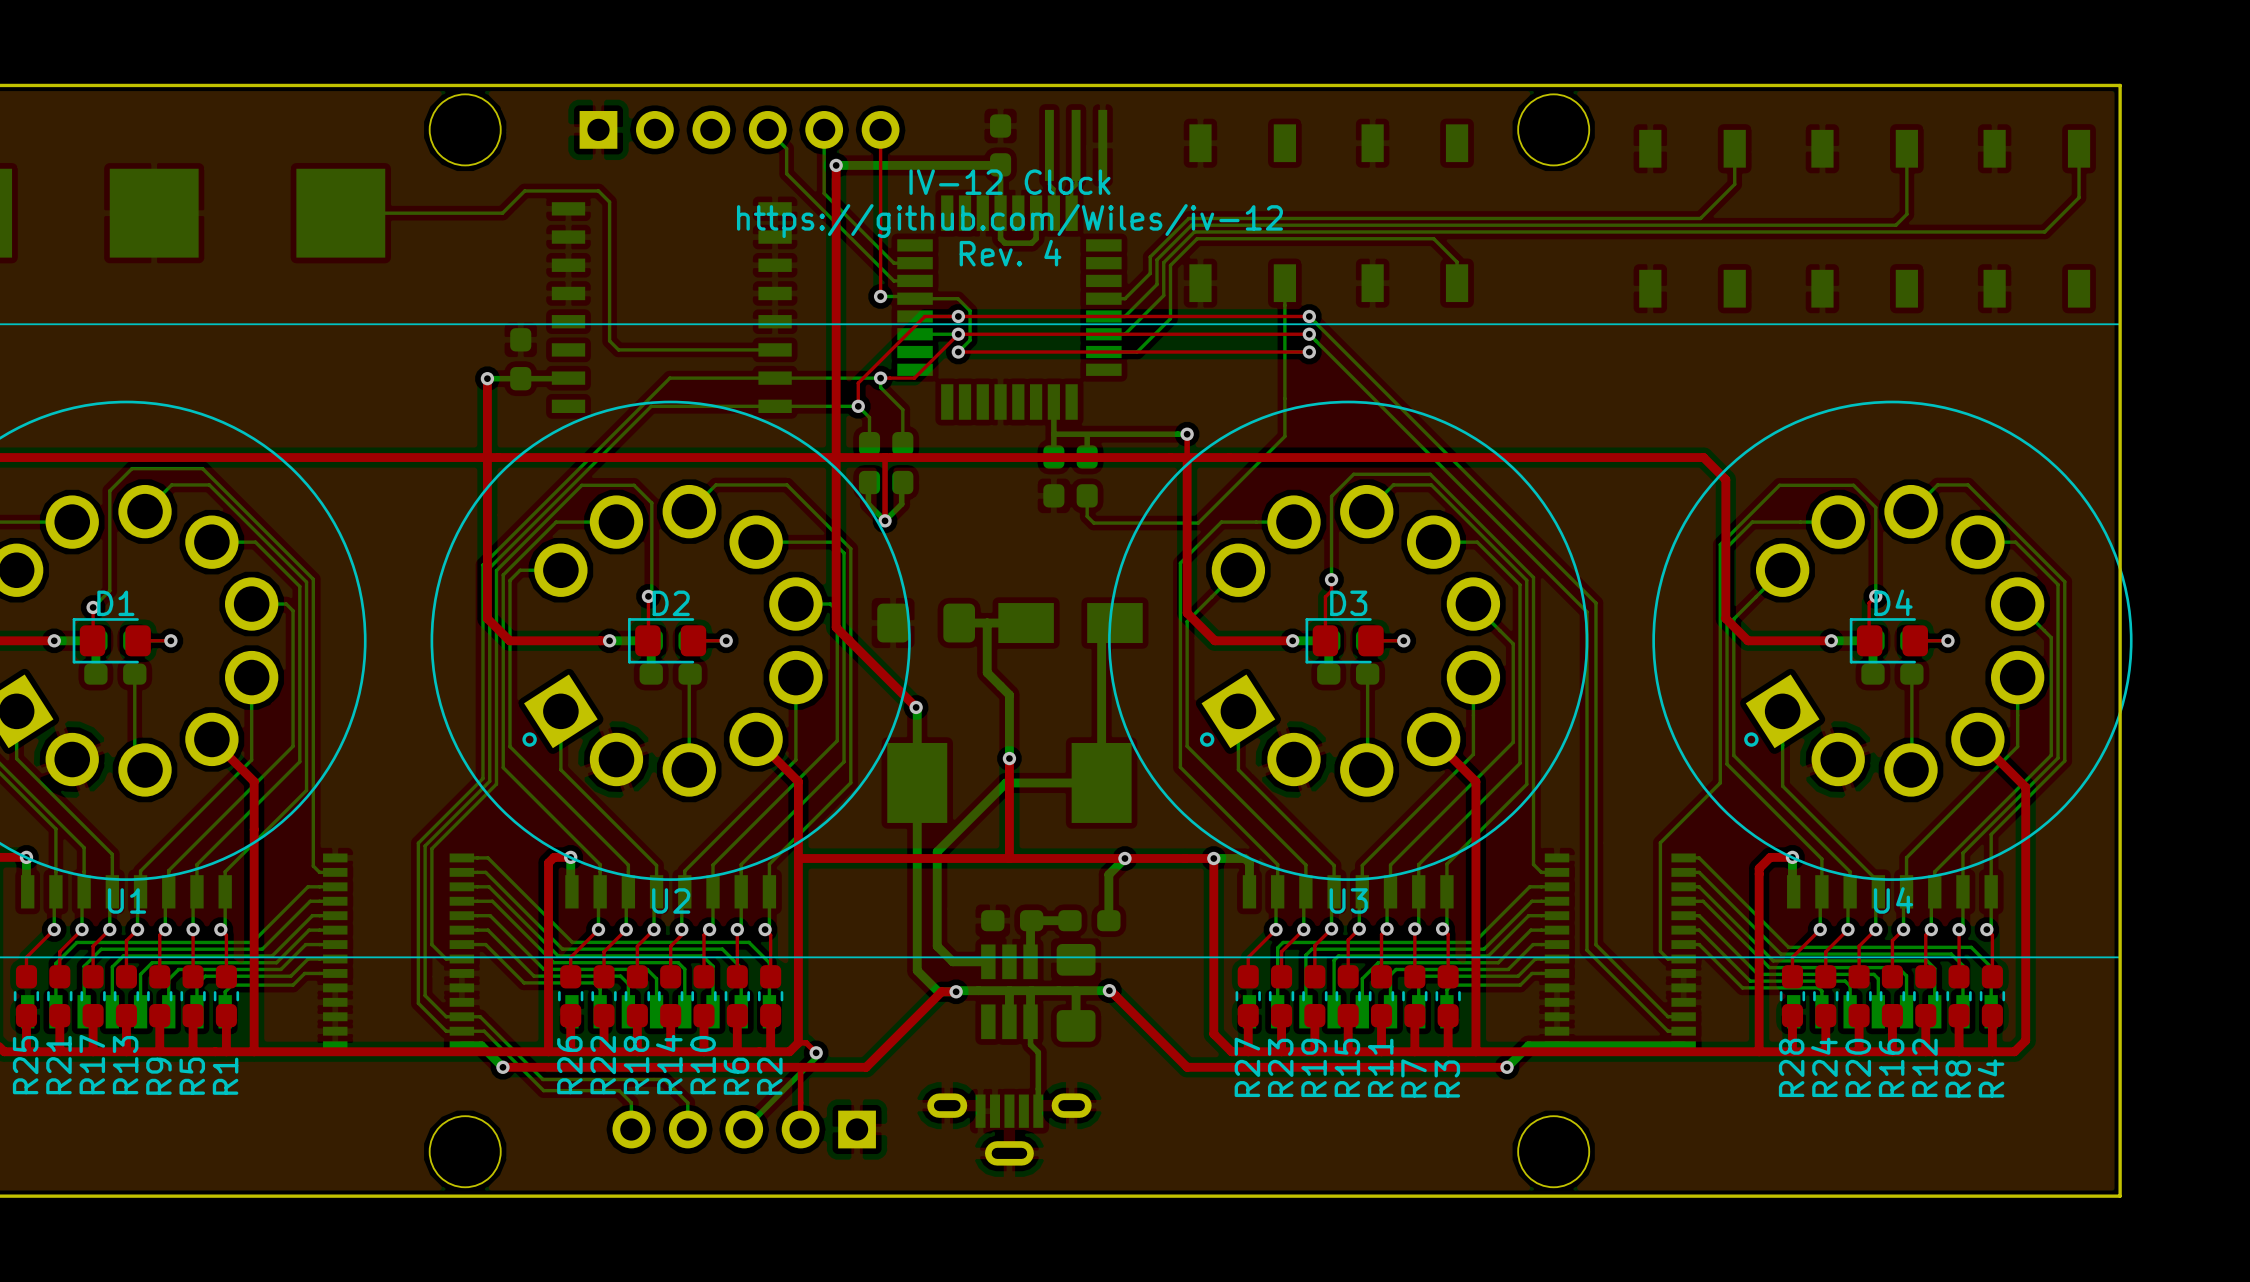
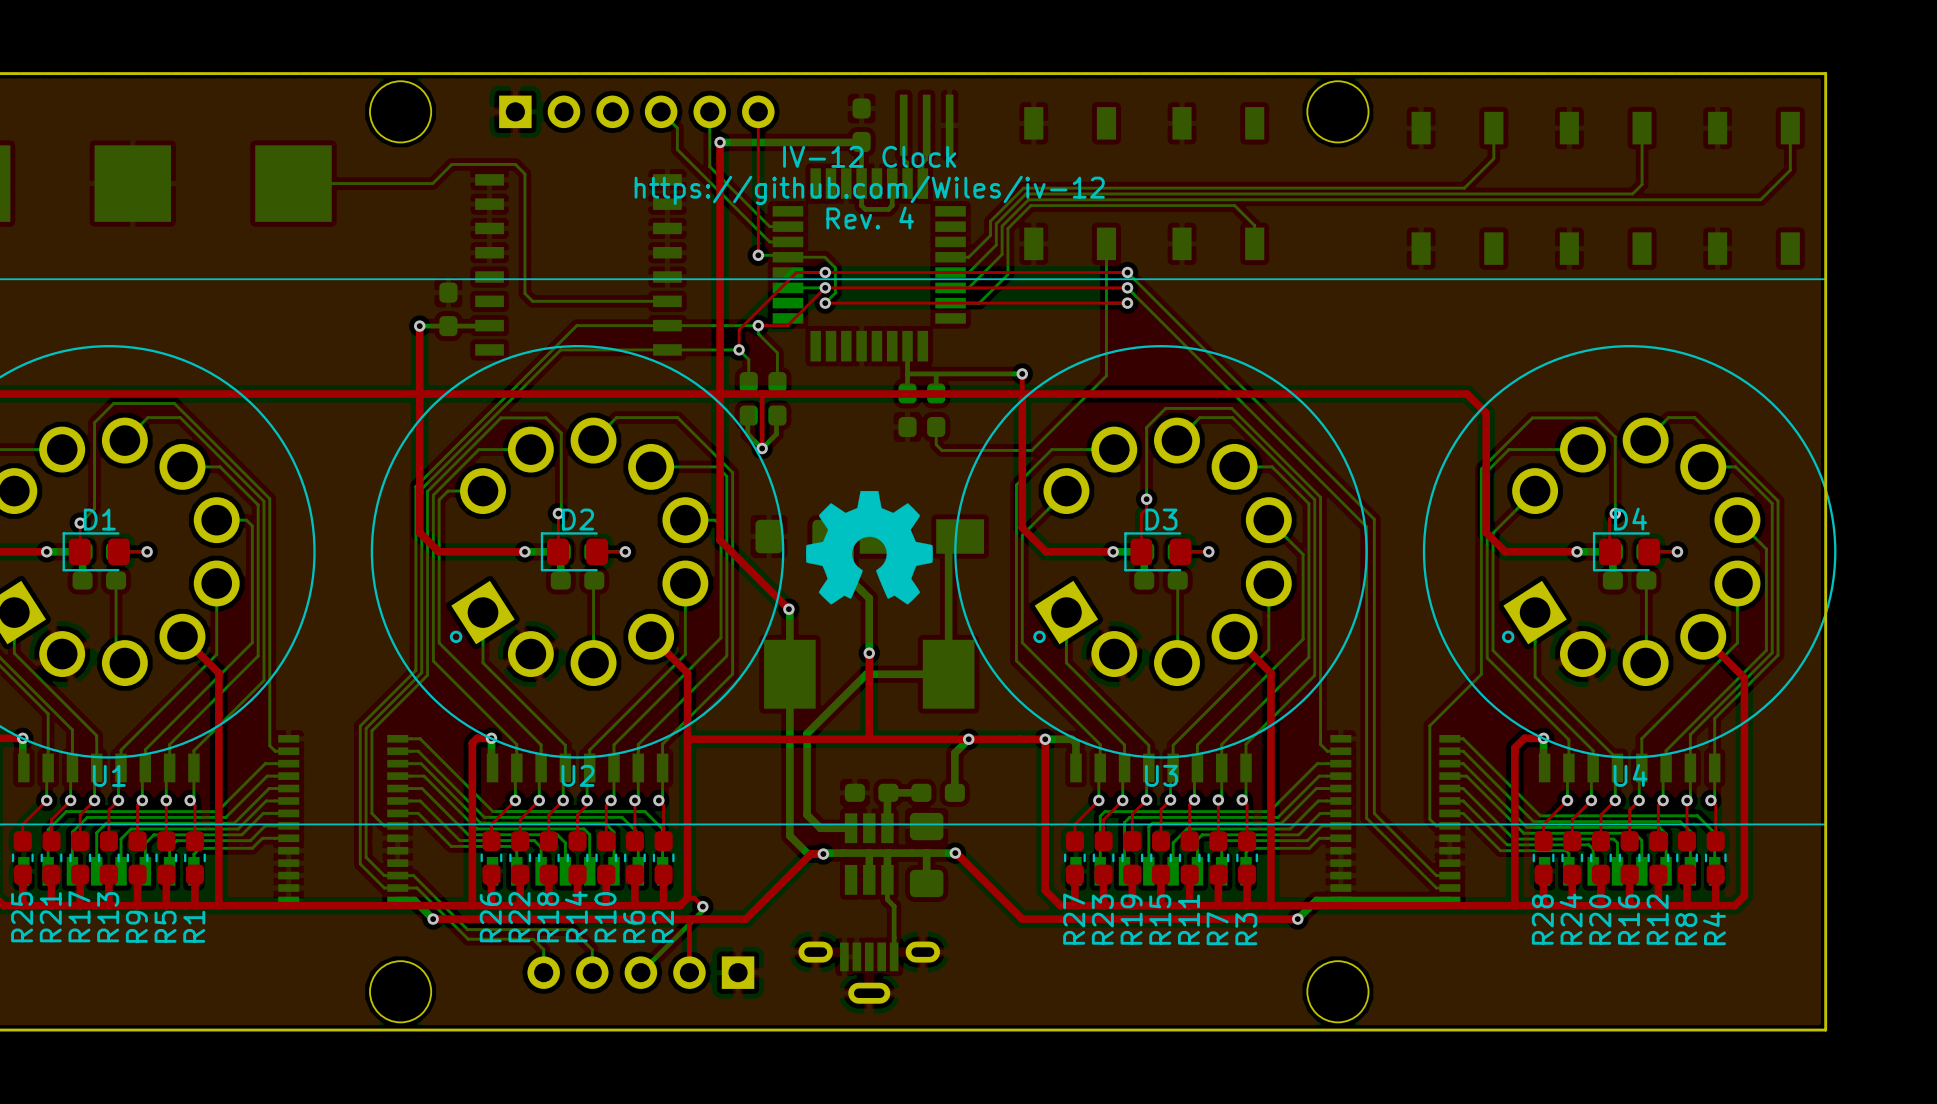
drawing: none -> [806, 490, 933, 605]

